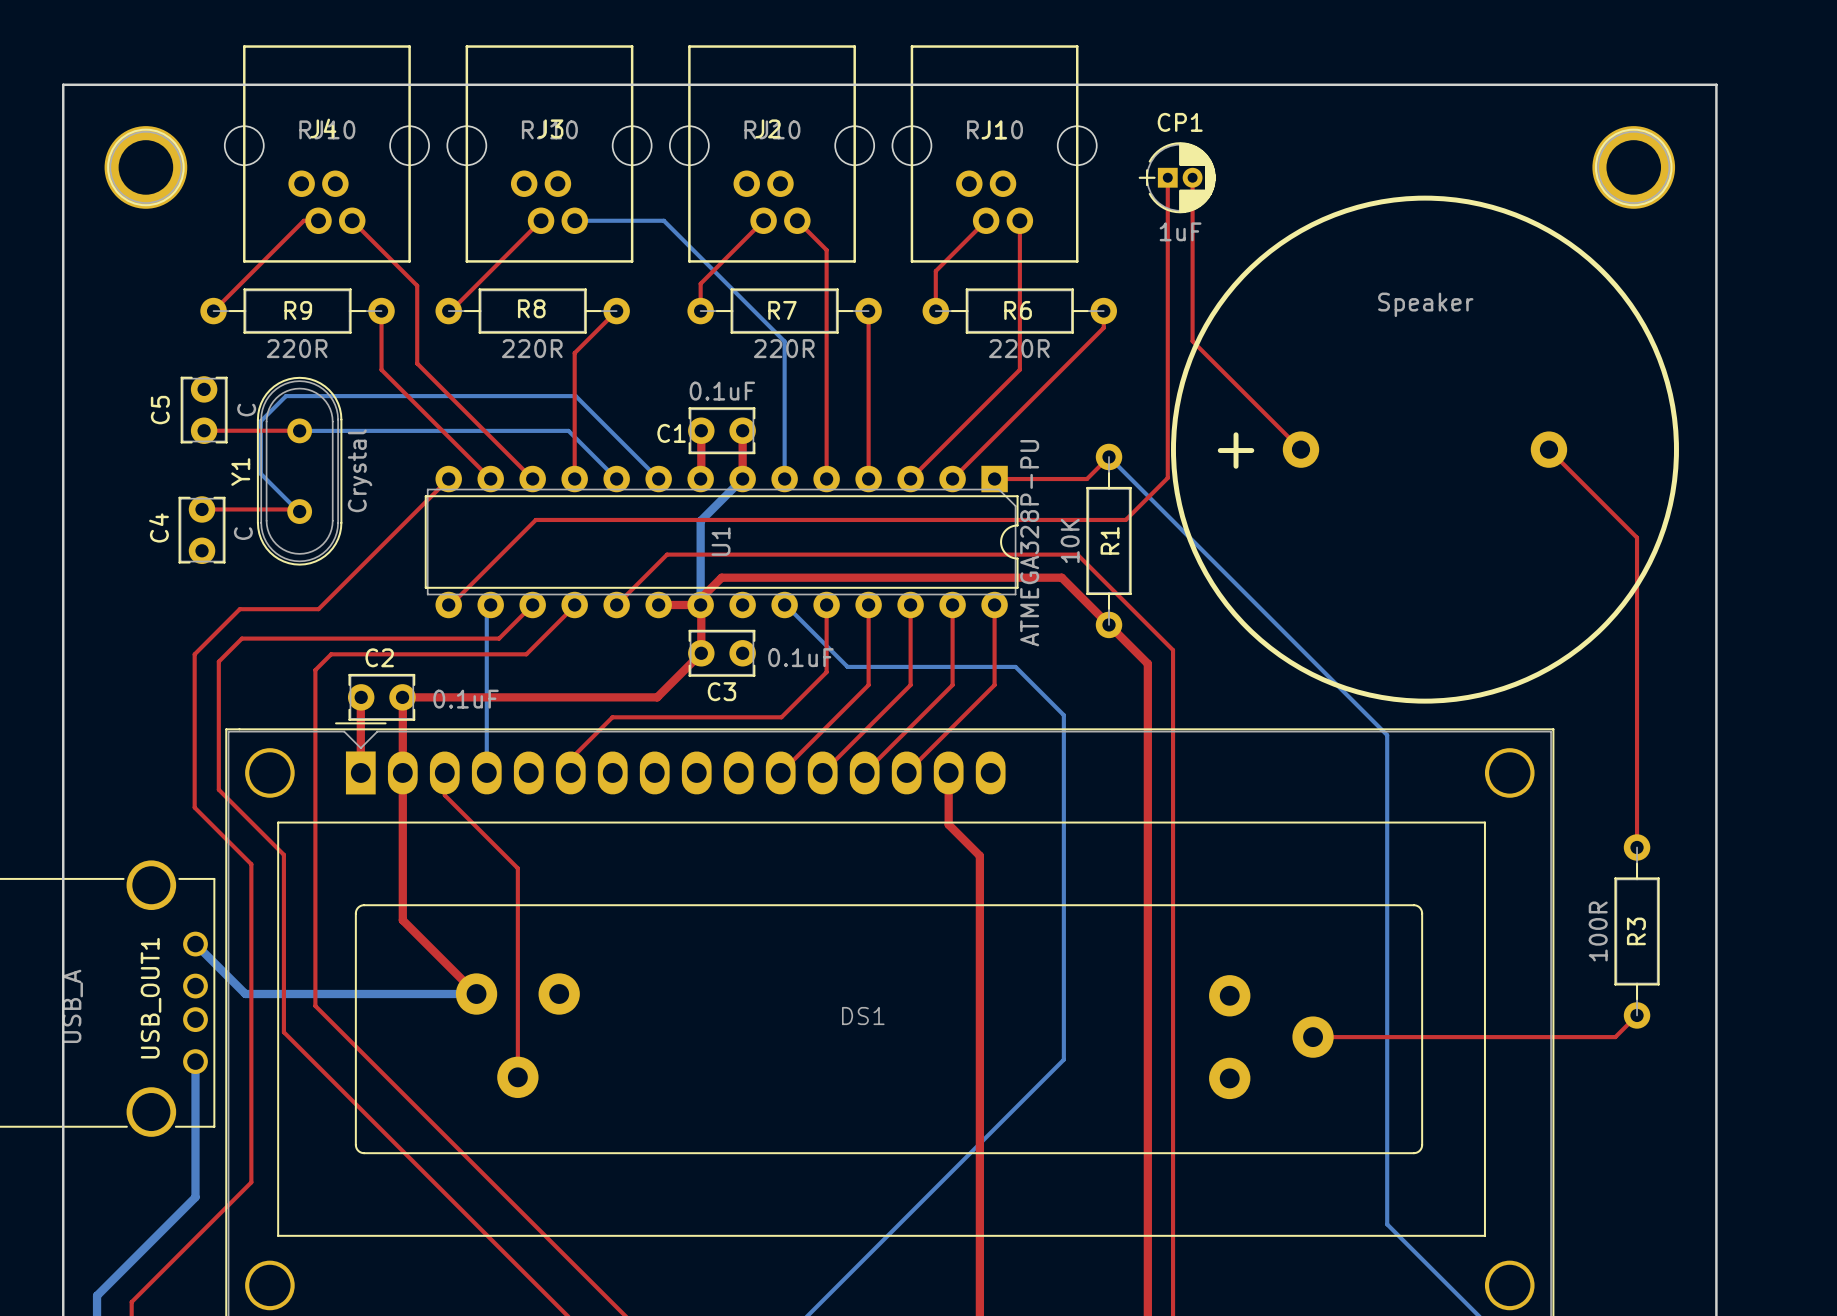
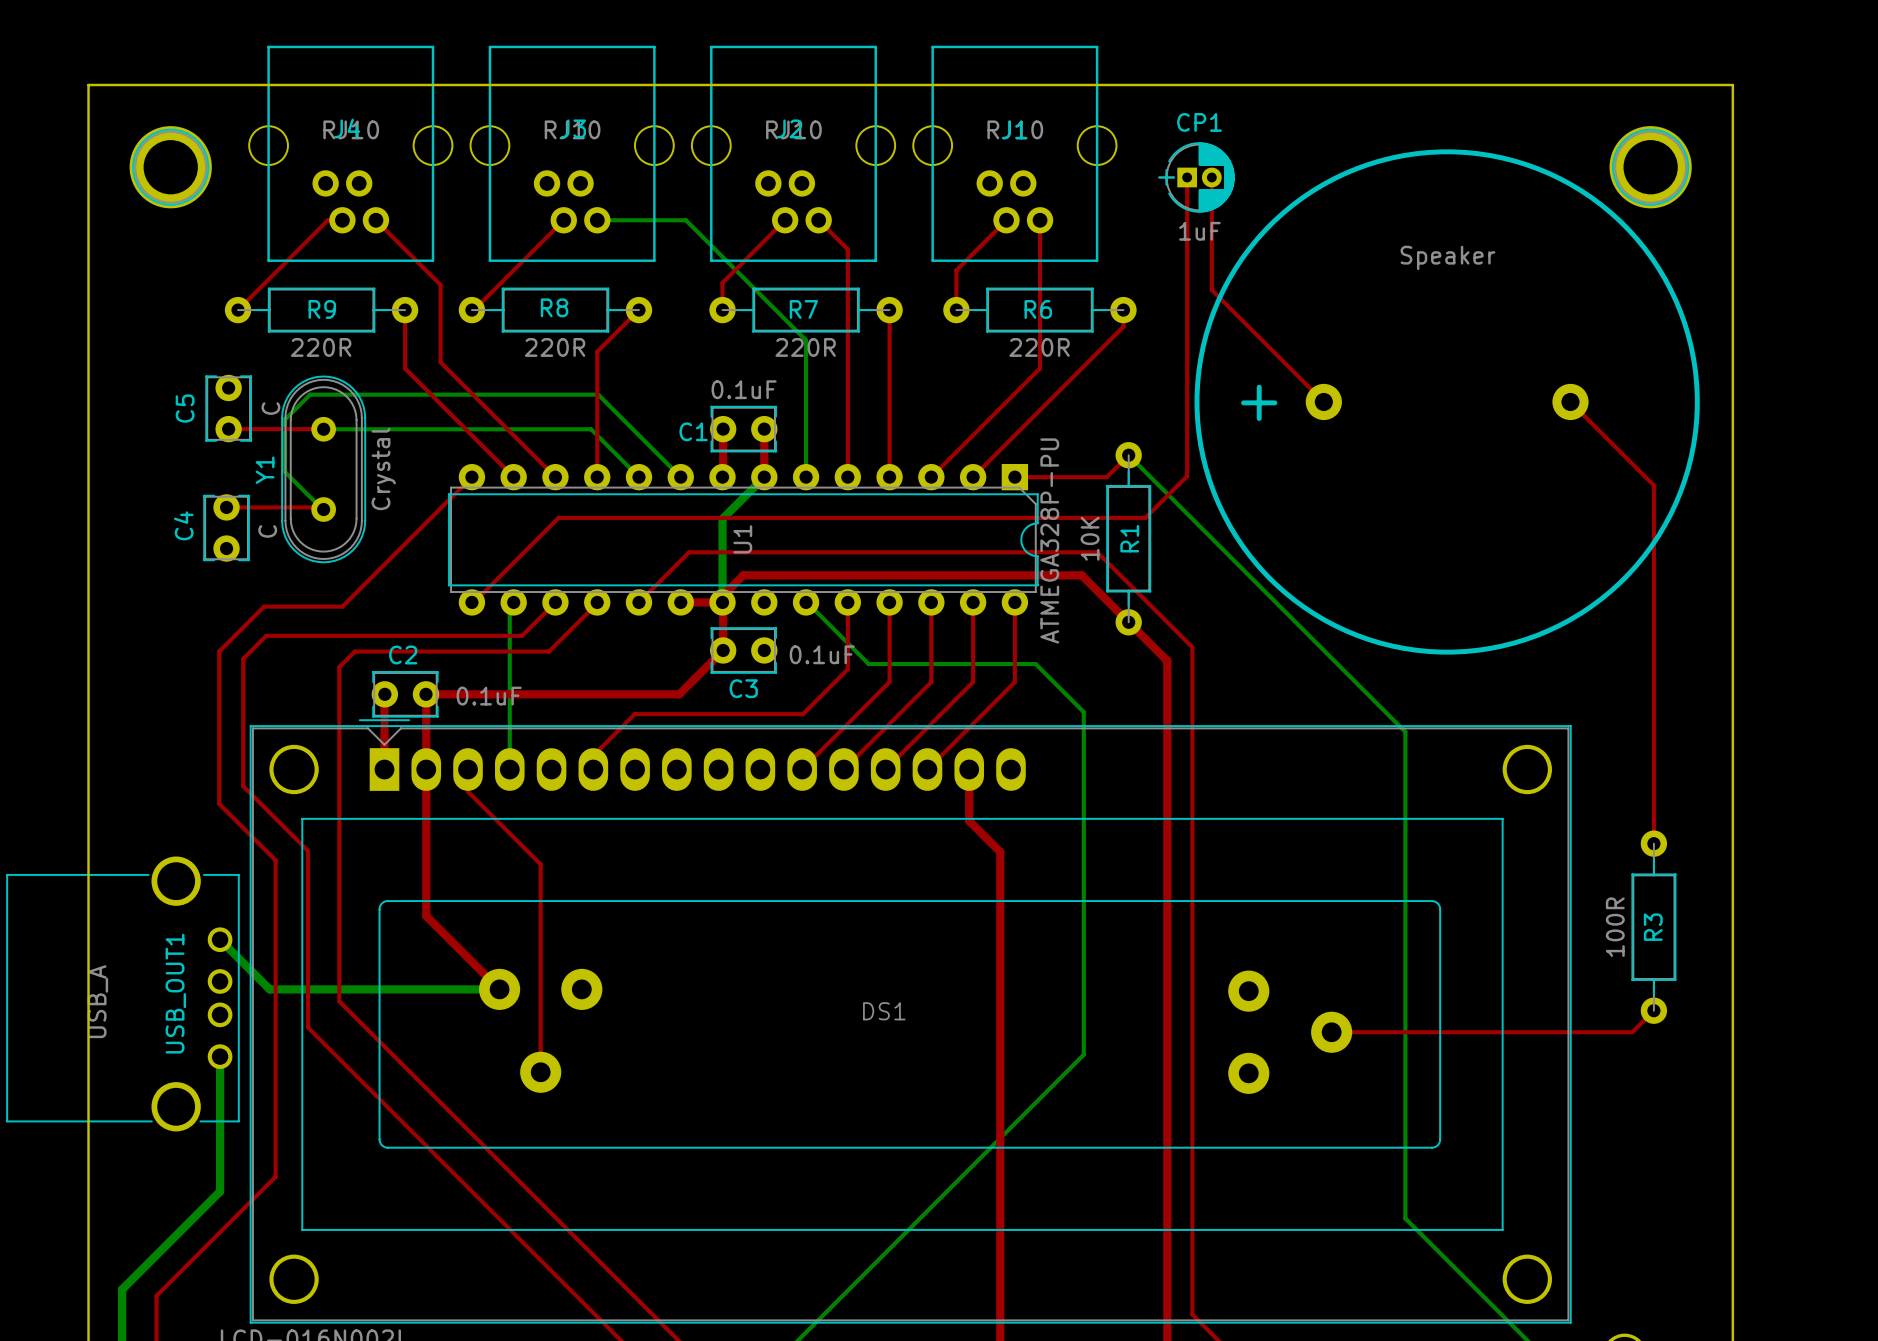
top track: (1192, 290) (1192, 341) (1301, 449) -> (1211, 289) (1323, 401)
part position: (1424, 449) -> (1447, 401)
top track: (1548, 449) (1637, 537) -> (1570, 401) (1653, 485) (1653, 535)

